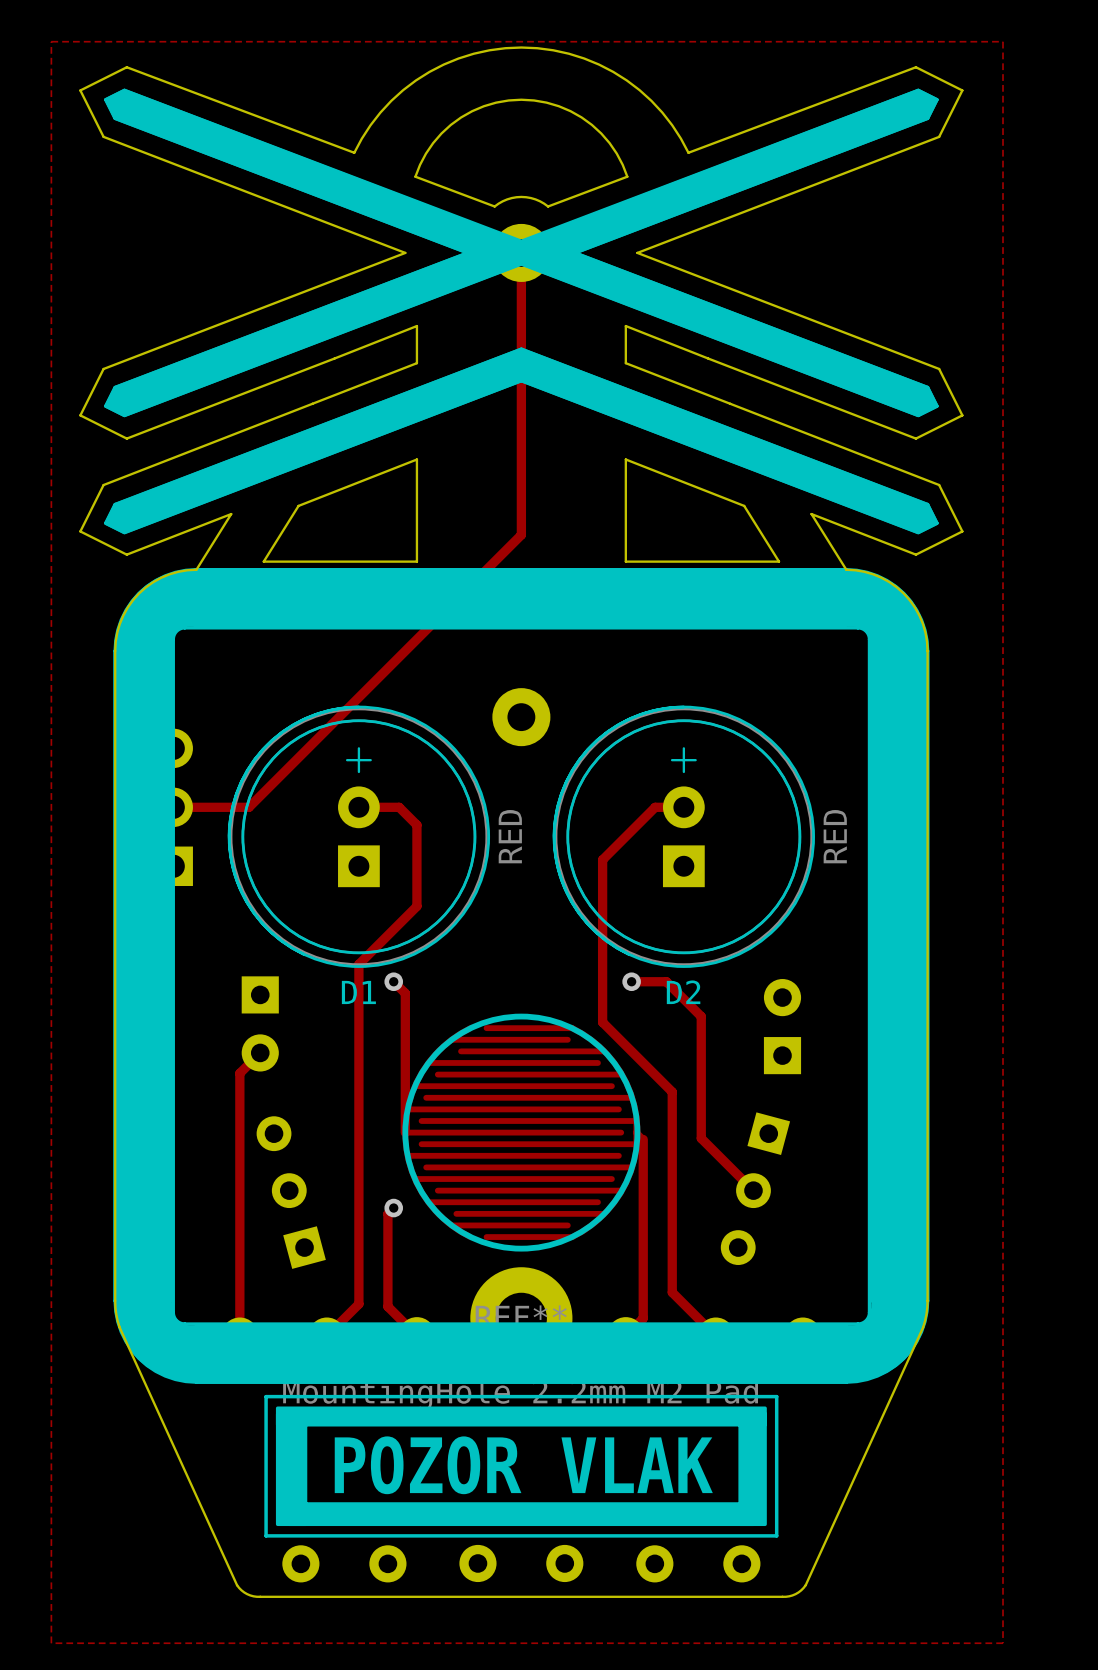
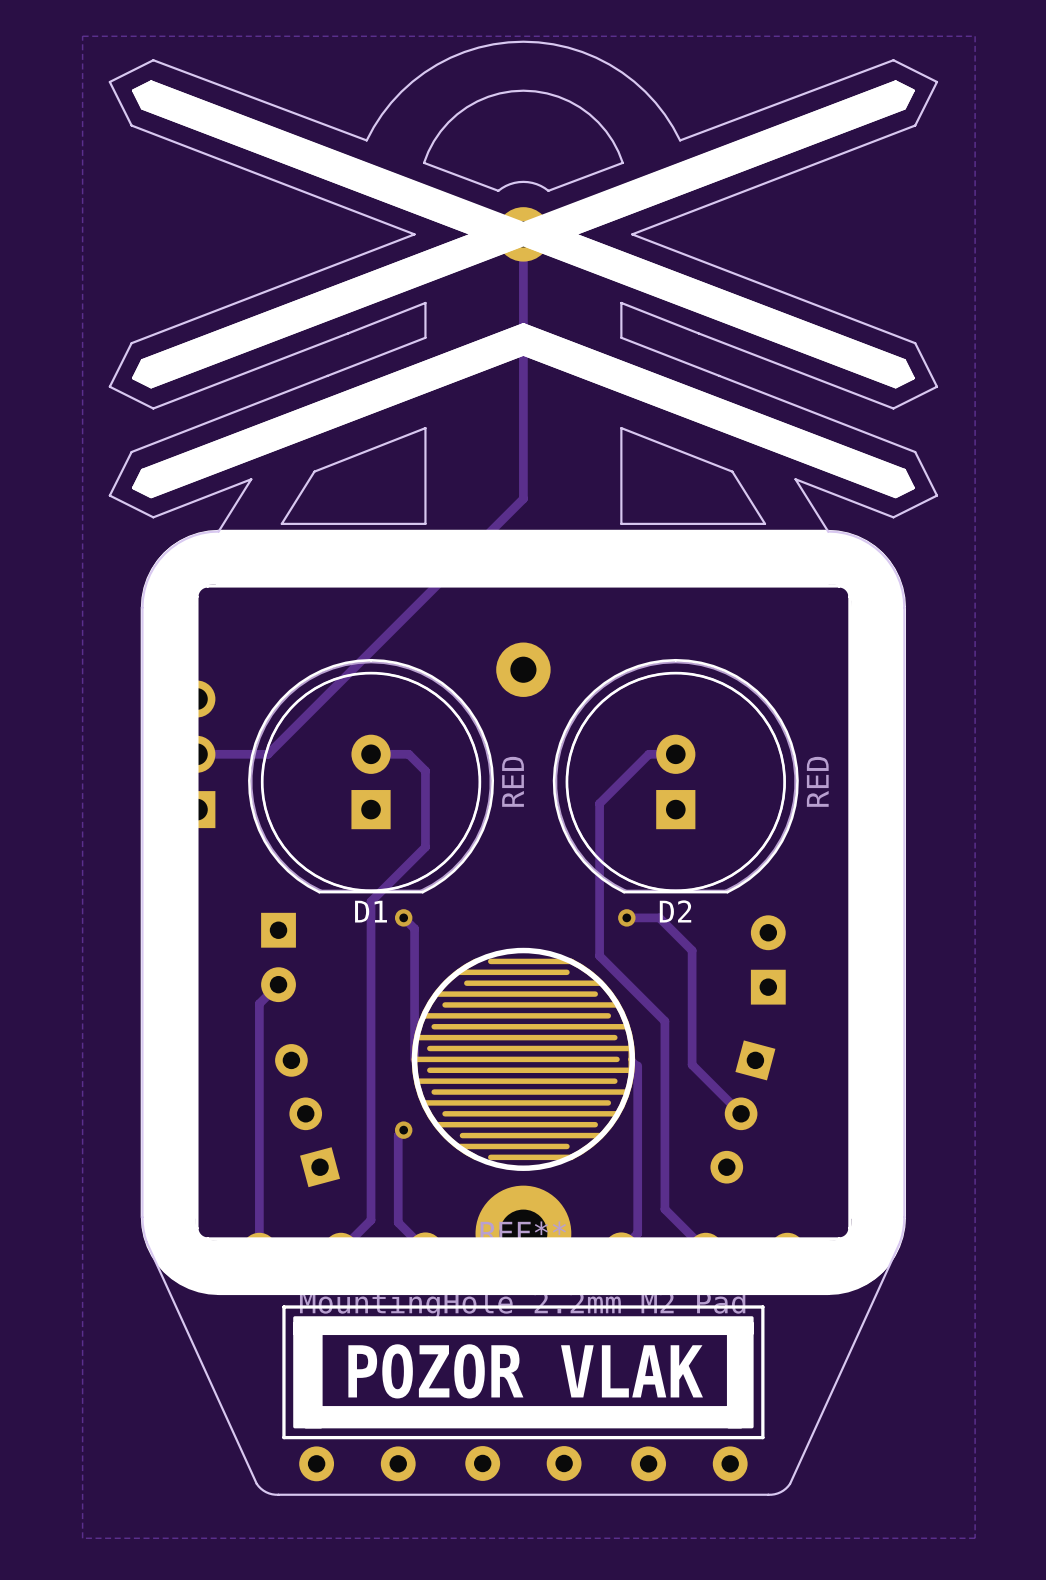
D1 footprint: [227, 705, 491, 968] -> [248, 658, 495, 894]
D2 footprint: [552, 705, 815, 968] -> [552, 658, 799, 894]

